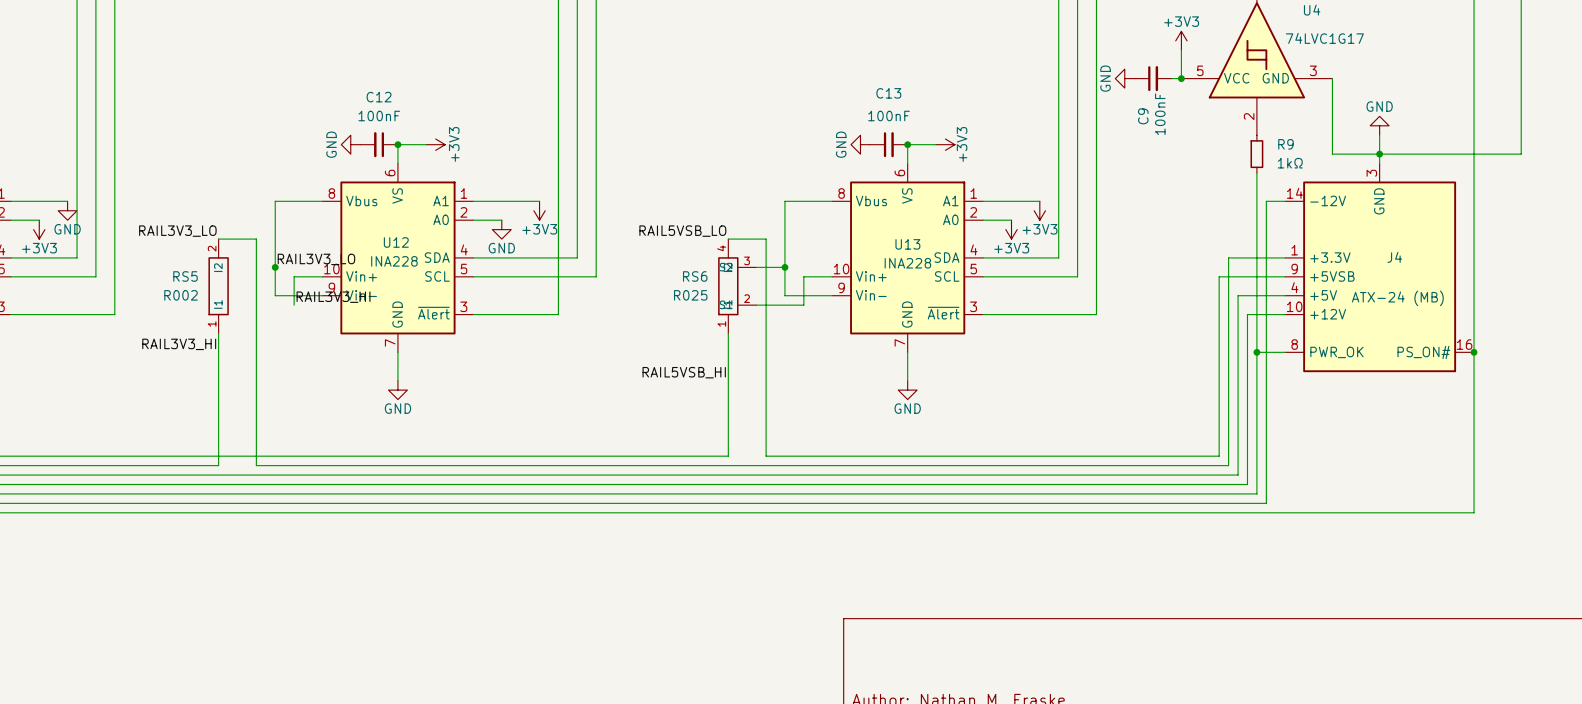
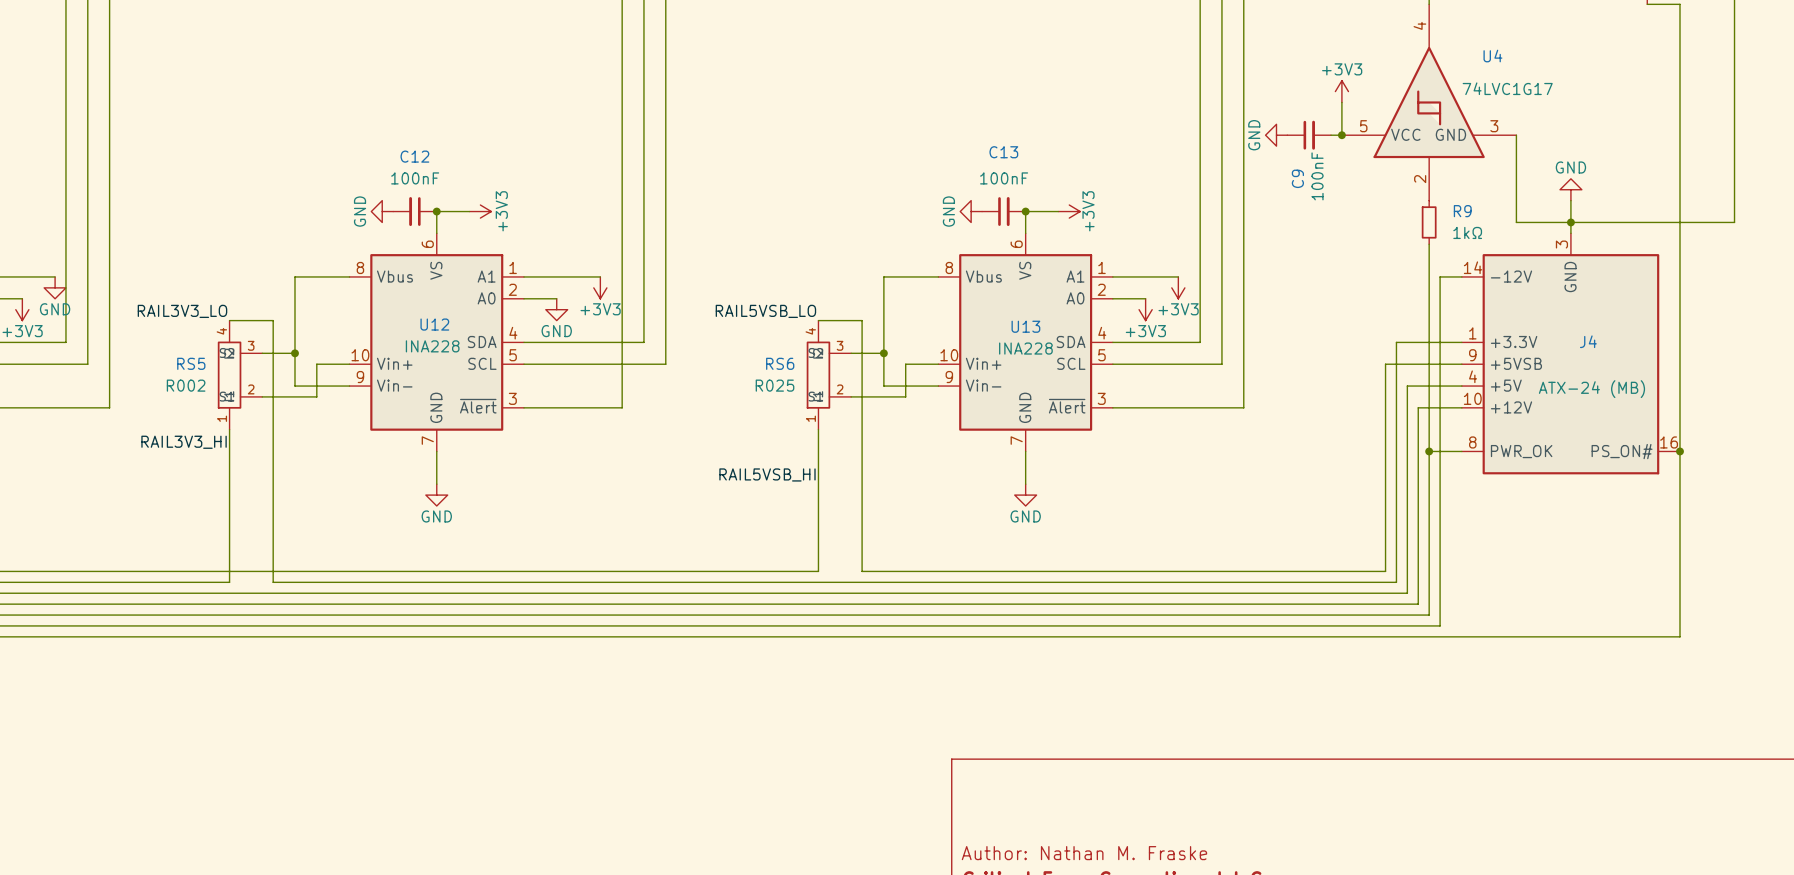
RS5 symbol: [208, 239, 229, 334] -> [217, 320, 263, 430]
label: RAIL3V3_LO (316, 259) -> none
wire: none -> (262, 353) (294, 353)
label: RAIL3V3_HI (333, 297) -> none
wire: none -> (262, 396) (316, 396)

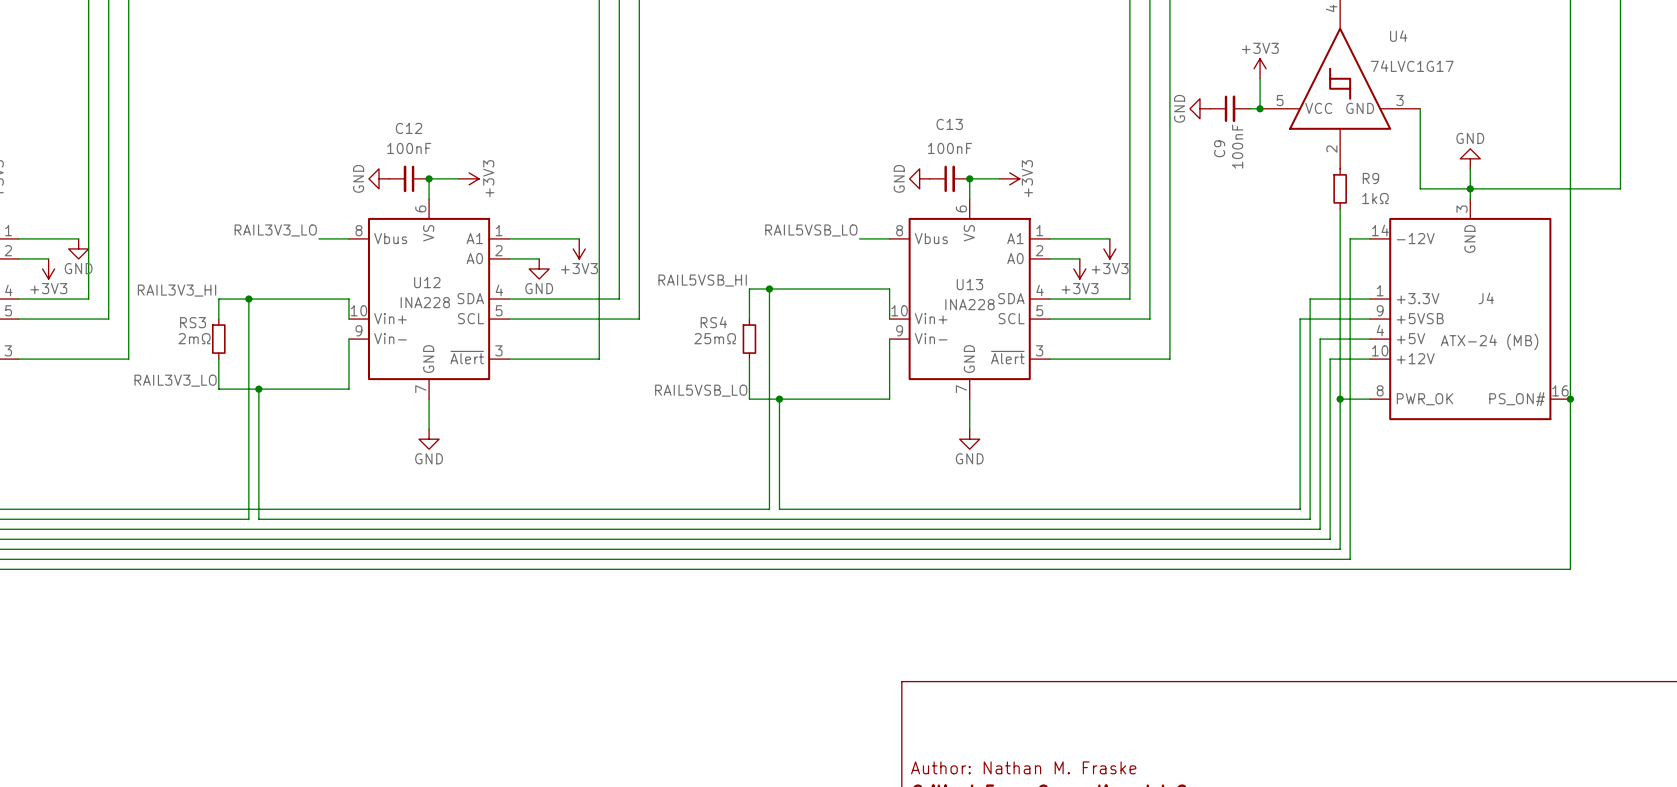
label: none -> RAIL3V3_LO (275, 230)
label: none -> RAIL5VSB_LO (811, 230)
wire: (316, 276) (294, 276) (294, 386) (349, 386) -> (218, 359) (218, 389) (348, 389) (348, 339)
wire: (905, 276) (883, 276) (883, 386) (938, 386) -> (749, 359) (749, 399) (889, 399) (889, 339)
label: RAIL3V3_LO (182, 311) -> none
label: RAIL5VSB_LO (765, 311) -> none
wire: (229, 320) (273, 320) (273, 582) -> (258, 389) (258, 519) (278, 519)
wire: (818, 320) (862, 320) (862, 571) -> none
wire: none -> (769, 289) (769, 509)
junction: none -> (769, 289)
junction: none -> (248, 299)
wire: (262, 353) (294, 353) -> none
junction: (294, 353) -> none
wire: (851, 353) (883, 353) -> none
junction: (883, 353) -> none
wire: (349, 364) (316, 364) (316, 396) (262, 396) -> (348, 319) (348, 299) (218, 299) (218, 319)
wire: (938, 364) (905, 364) (905, 396) (851, 396) -> (889, 319) (889, 289) (749, 289) (749, 319)
RS5: R002 (240, 375) -> none
RS6: R025 (828, 375) -> none
RS3: none -> 2mΩ (218, 339)
RS4: none -> 25mΩ (749, 339)
wire: (229, 429) (229, 582) -> (248, 299) (248, 519) (238, 519)
wire: (818, 429) (818, 451) -> none
label: none -> RAIL3V3_LO (175, 380)
junction: none -> (258, 389)
label position: RAIL3V3_HI (184, 442) -> RAIL3V3_HI (177, 290)
label: none -> RAIL5VSB_LO (701, 390)
junction: none -> (779, 399)
label position: RAIL5VSB_HI (767, 474) -> RAIL5VSB_HI (702, 280)
wire: (807, 571) (818, 571) -> (819, 509) (779, 509)

